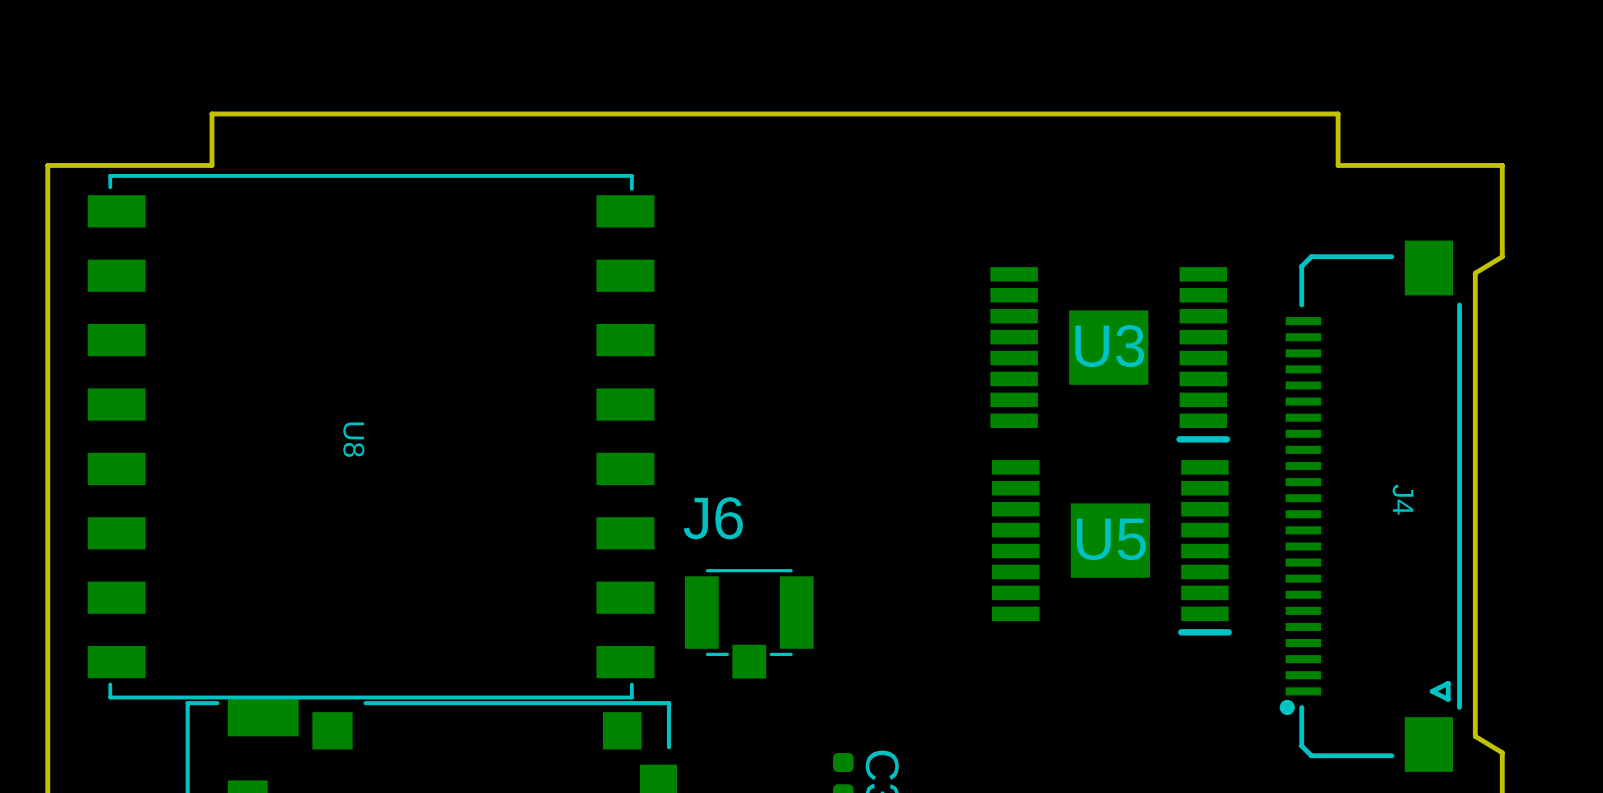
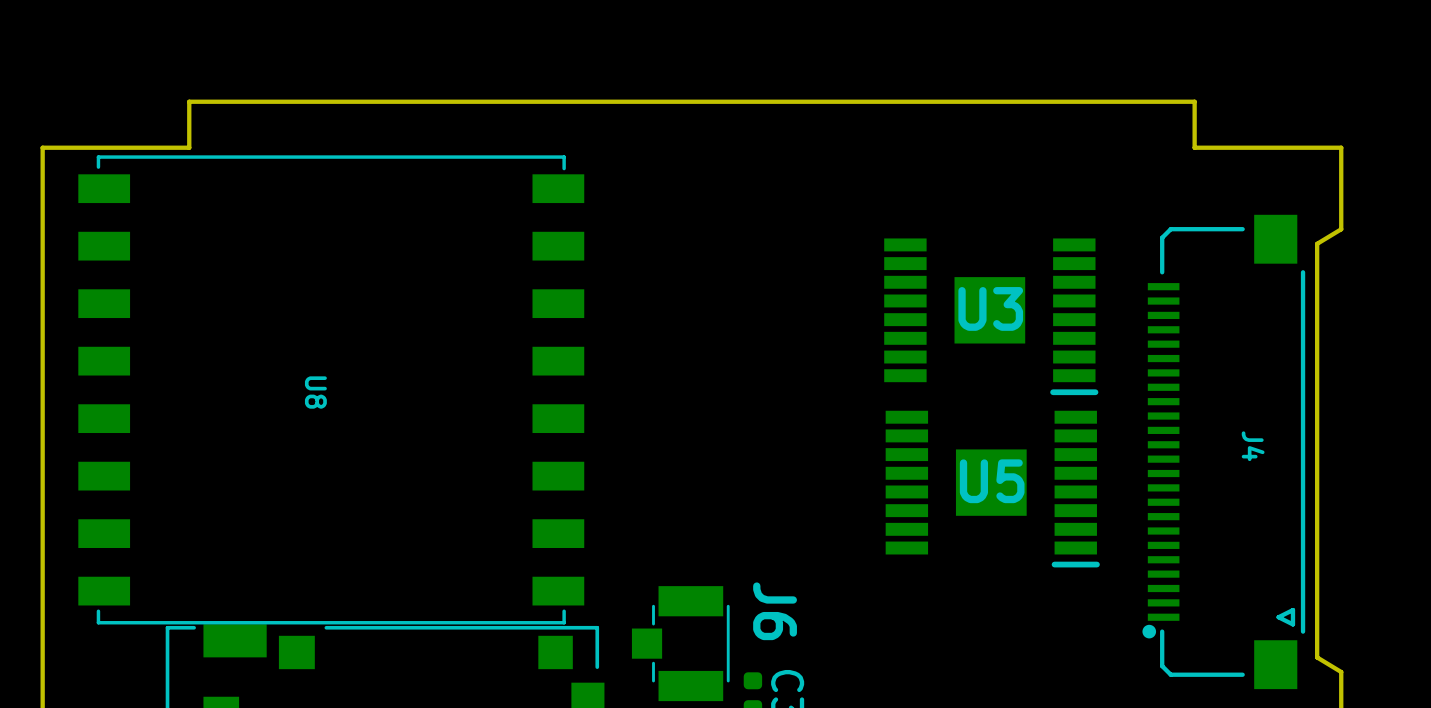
J6 rotation: 0° (749, 623) -> 90° clockwise (680, 643)
J6 position: (749, 623) -> (680, 643)

